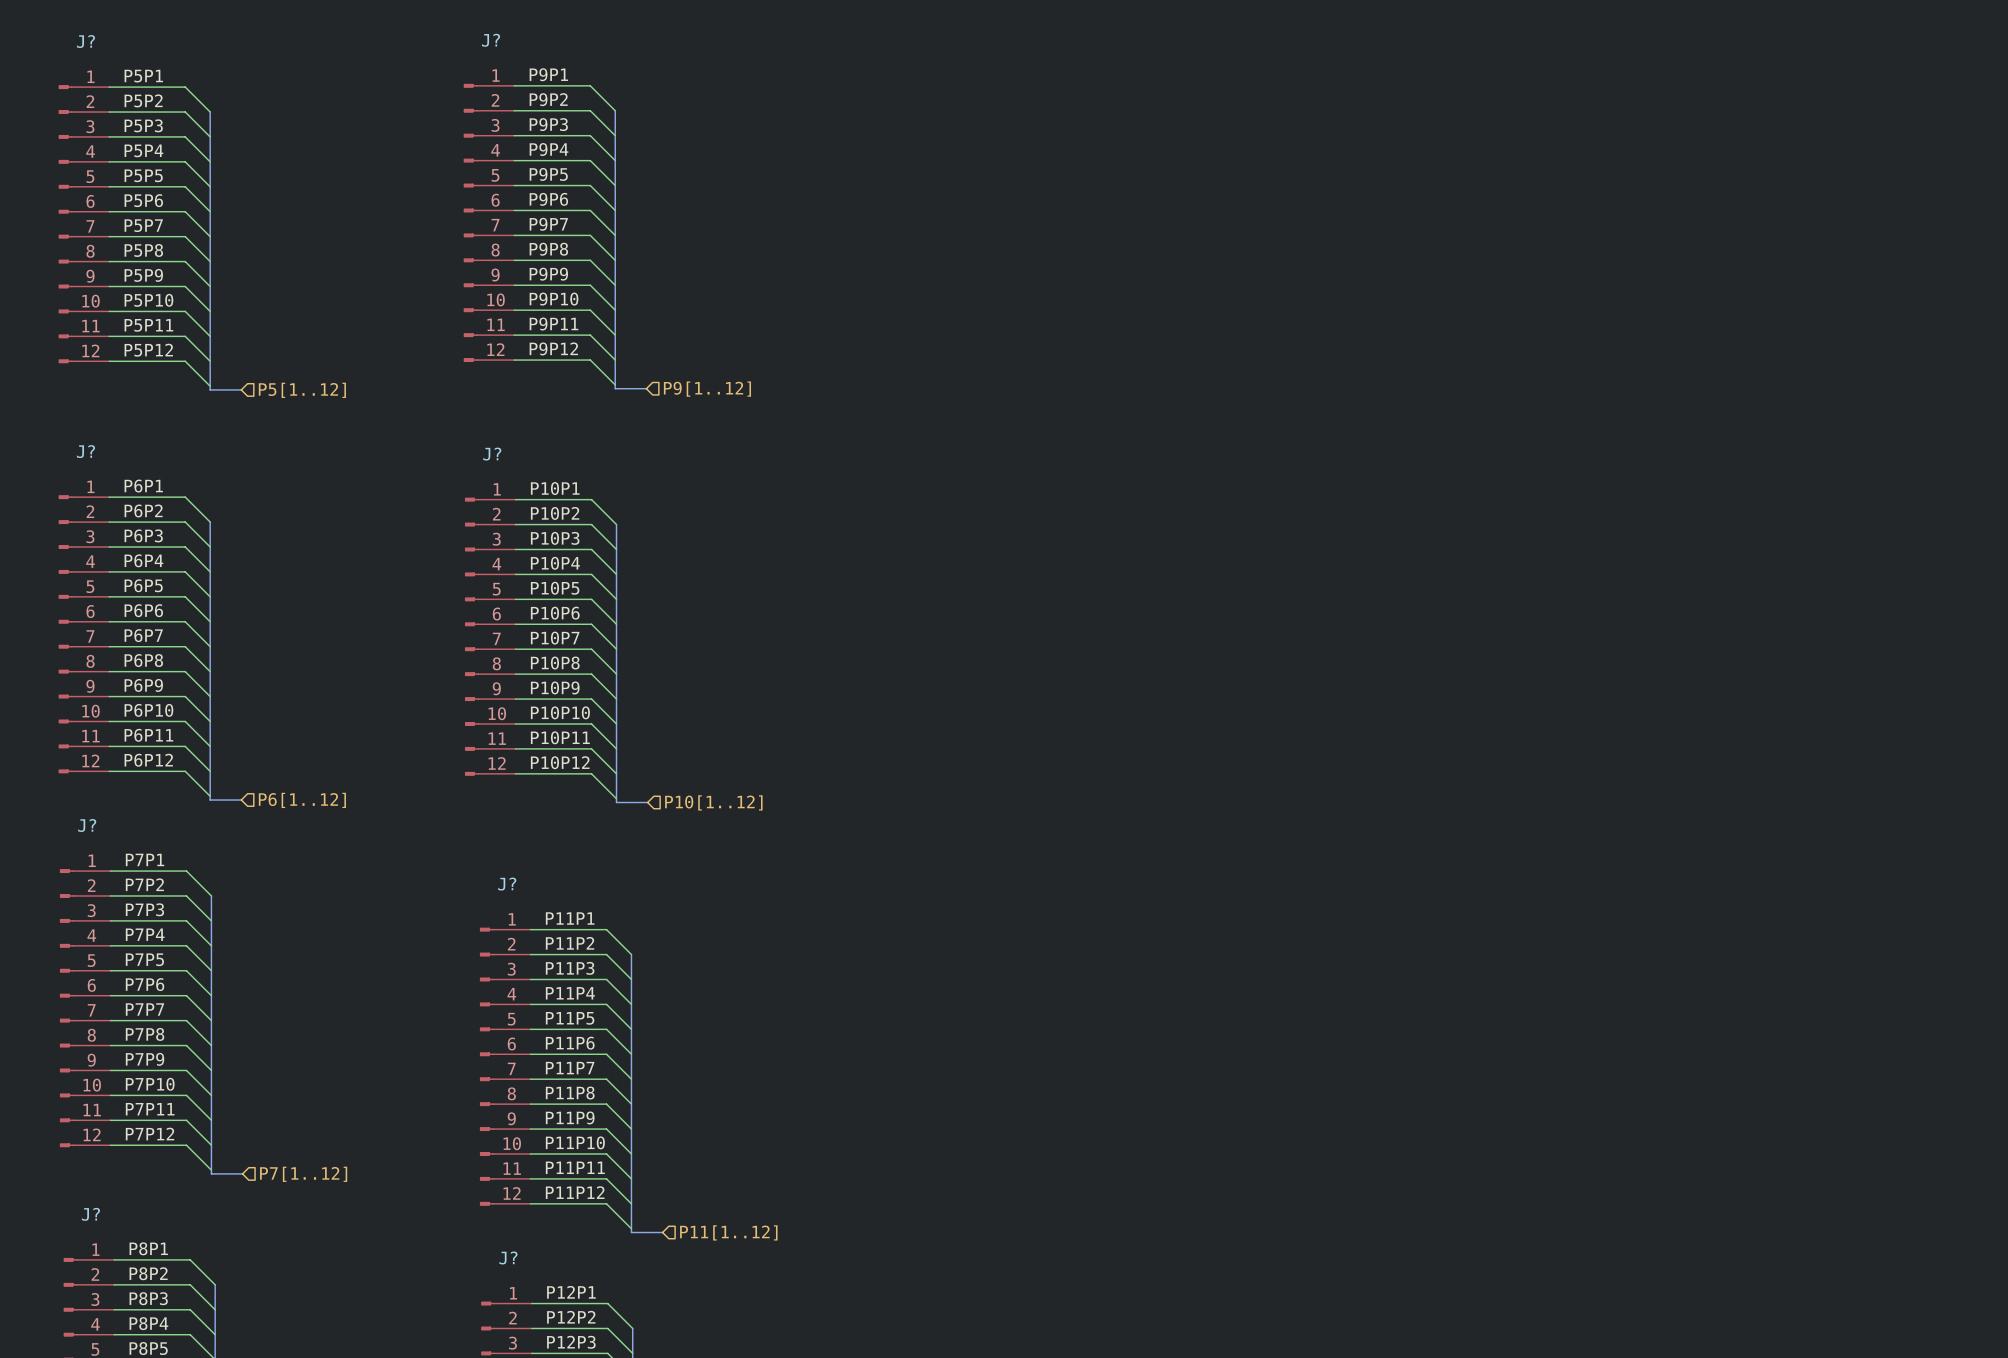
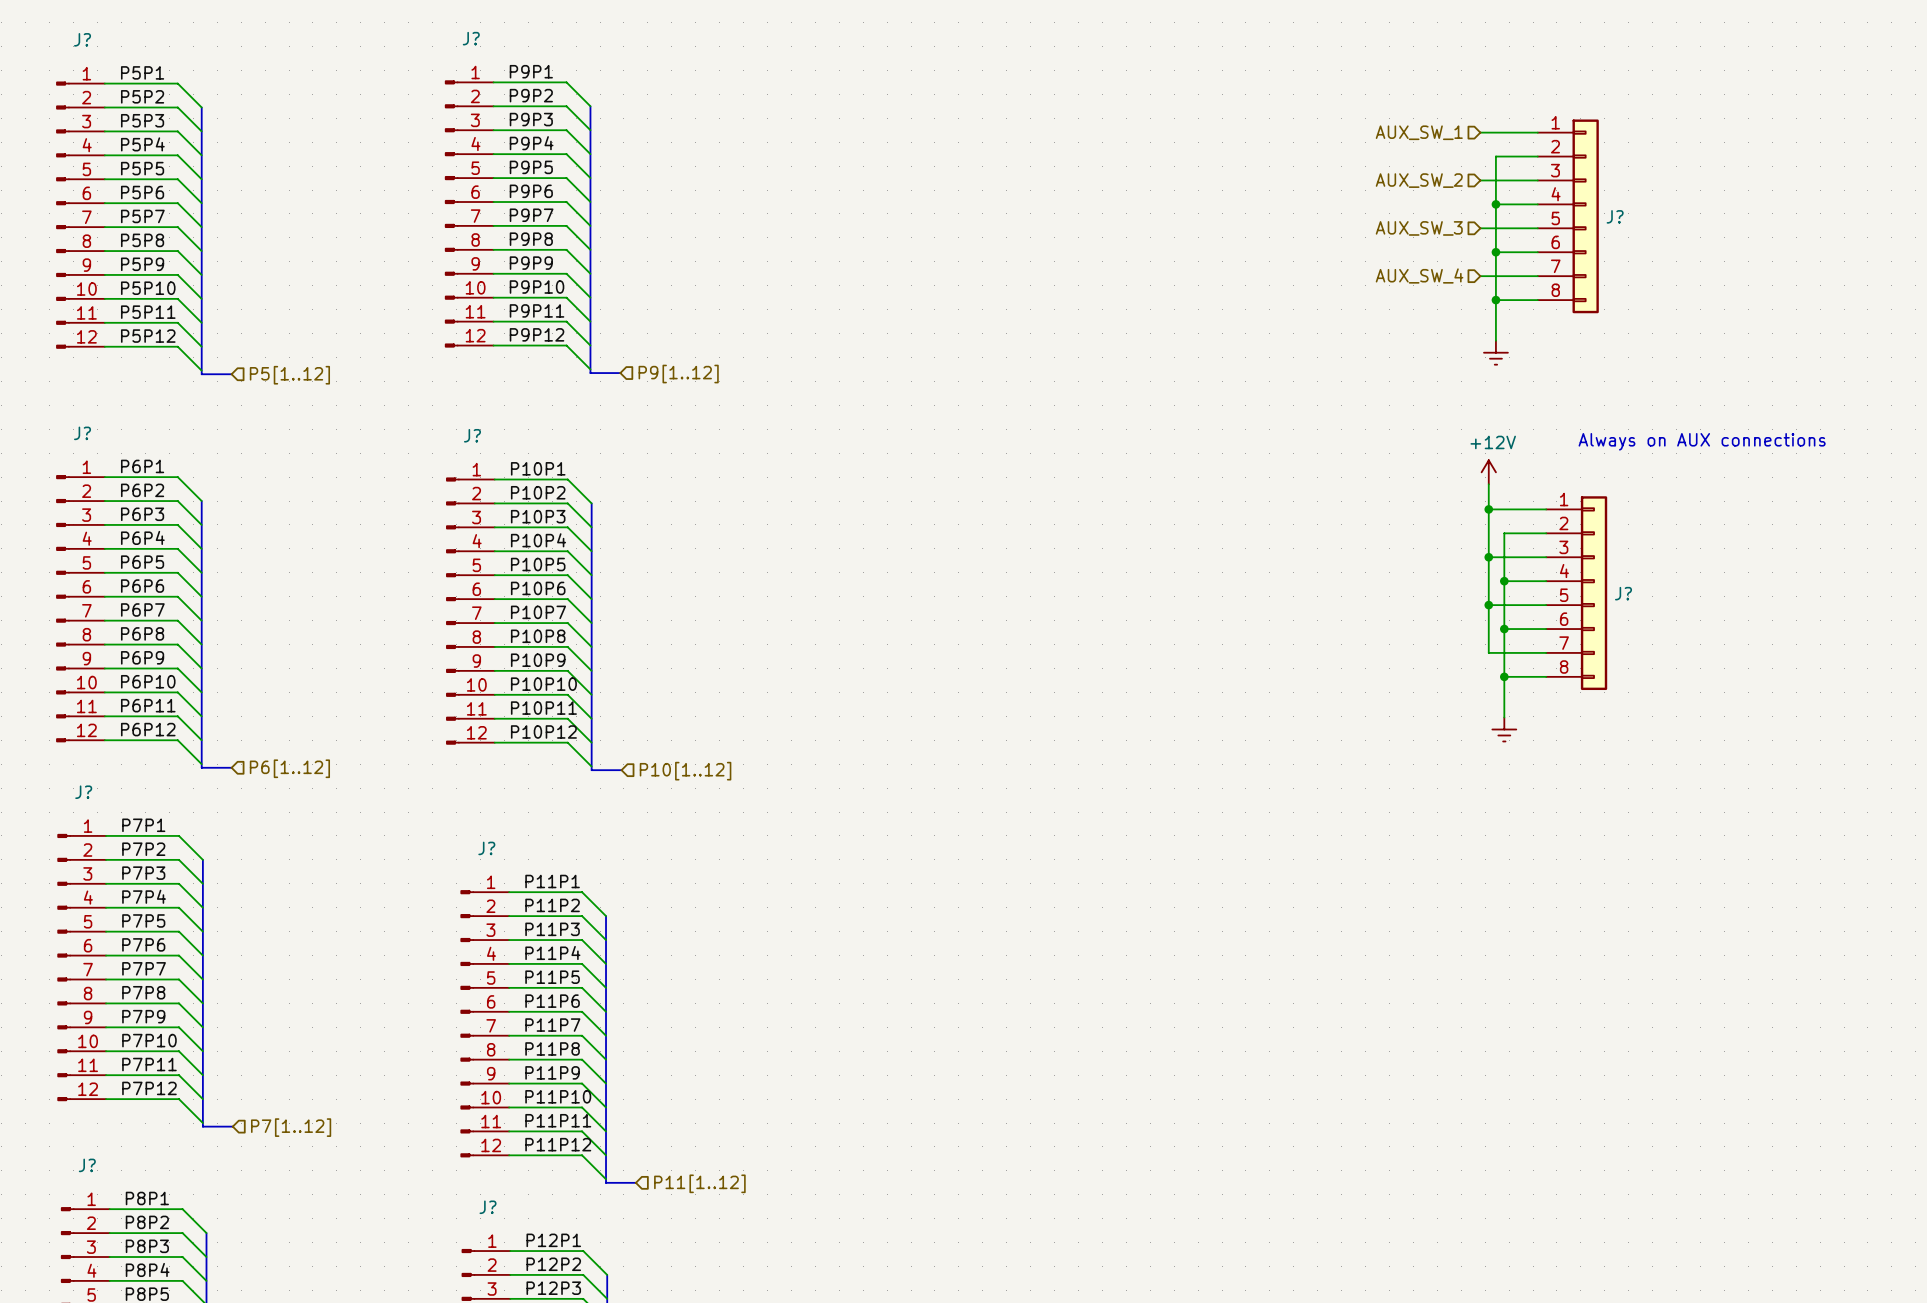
wire: none -> (1480, 132) (1537, 132)
hierarchical label: none -> AUX_SW_1 (1419, 132)
wire: none -> (1537, 156) (1495, 156) (1495, 340)
wire: none -> (1480, 180) (1537, 180)
hierarchical label: none -> AUX_SW_2 (1419, 180)
wire: none -> (1495, 204) (1537, 204)
junction: none -> (1495, 204)
J?: none -> (1568, 216)
wire: none -> (1480, 228) (1537, 228)
hierarchical label: none -> AUX_SW_3 (1419, 228)
wire: none -> (1495, 252) (1537, 252)
junction: none -> (1495, 252)
wire: none -> (1480, 276) (1537, 276)
hierarchical label: none -> AUX_SW_4 (1419, 276)
wire: none -> (1495, 300) (1537, 300)
junction: none -> (1495, 300)
power symbol: none -> (1495, 352)
text: none -> Always on AUX connections (1702, 441)
power symbol: none -> +12V (1488, 472)
wire: none -> (1488, 484) (1488, 652) (1546, 652)
wire: none -> (1488, 509) (1546, 509)
junction: none -> (1488, 509)
wire: none -> (1546, 533) (1504, 533) (1504, 717)
wire: none -> (1488, 557) (1546, 557)
junction: none -> (1488, 557)
wire: none -> (1504, 581) (1546, 581)
junction: none -> (1504, 581)
J?: none -> (1576, 593)
wire: none -> (1488, 605) (1546, 605)
junction: none -> (1488, 605)
wire: none -> (1504, 629) (1546, 629)
junction: none -> (1504, 629)
wire: none -> (1504, 676) (1546, 676)
junction: none -> (1504, 676)
power symbol: none -> (1504, 729)

